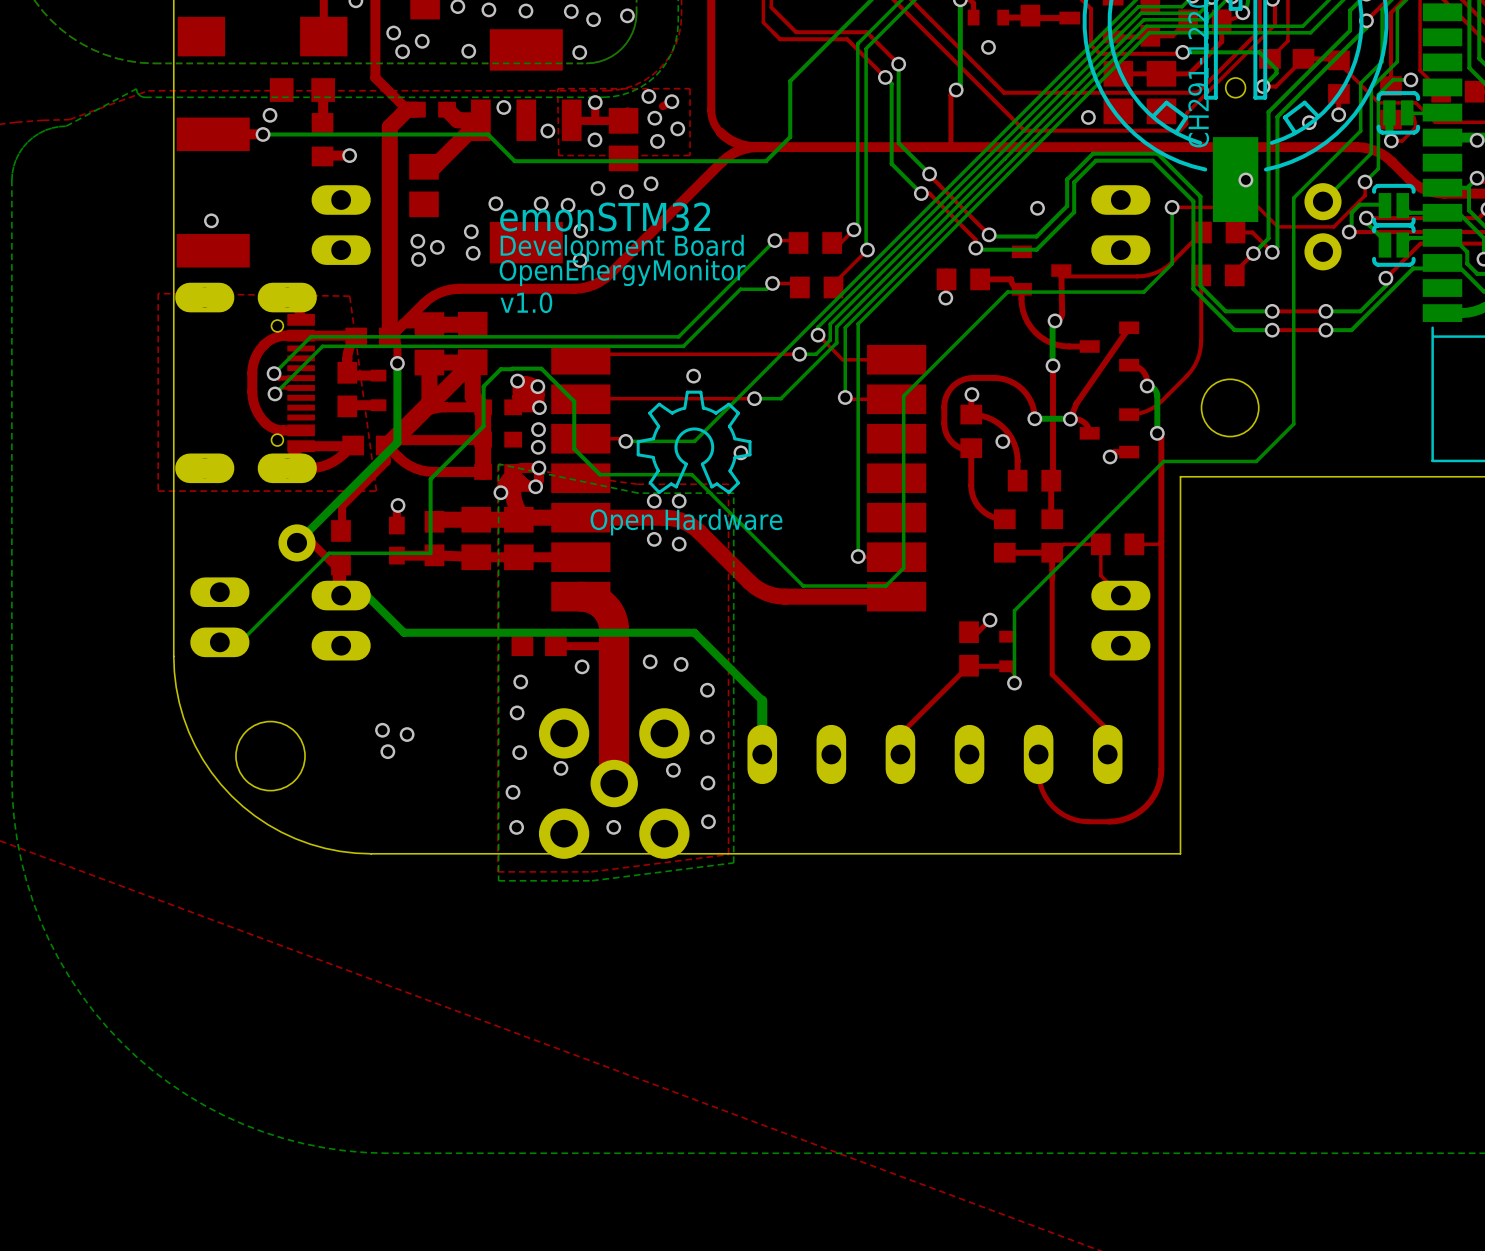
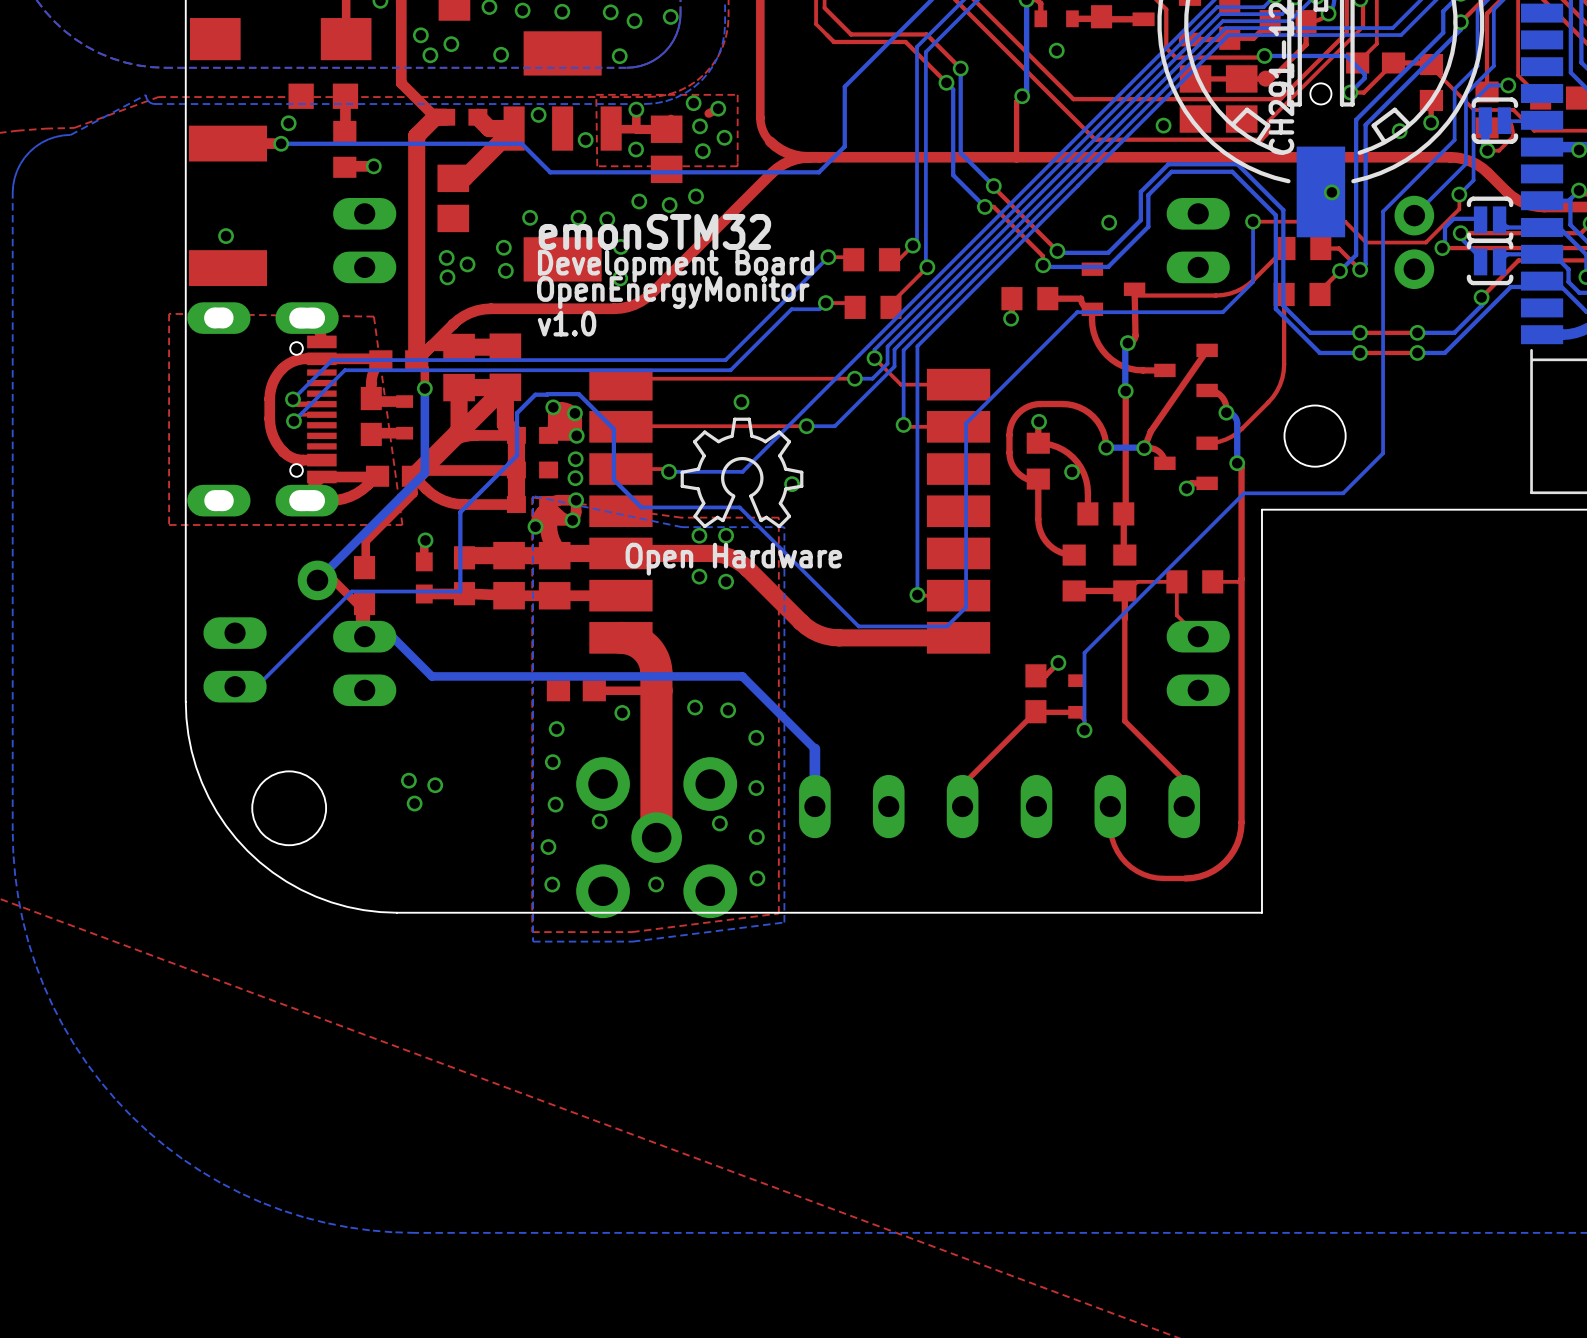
part: none -> (1265, 78)

